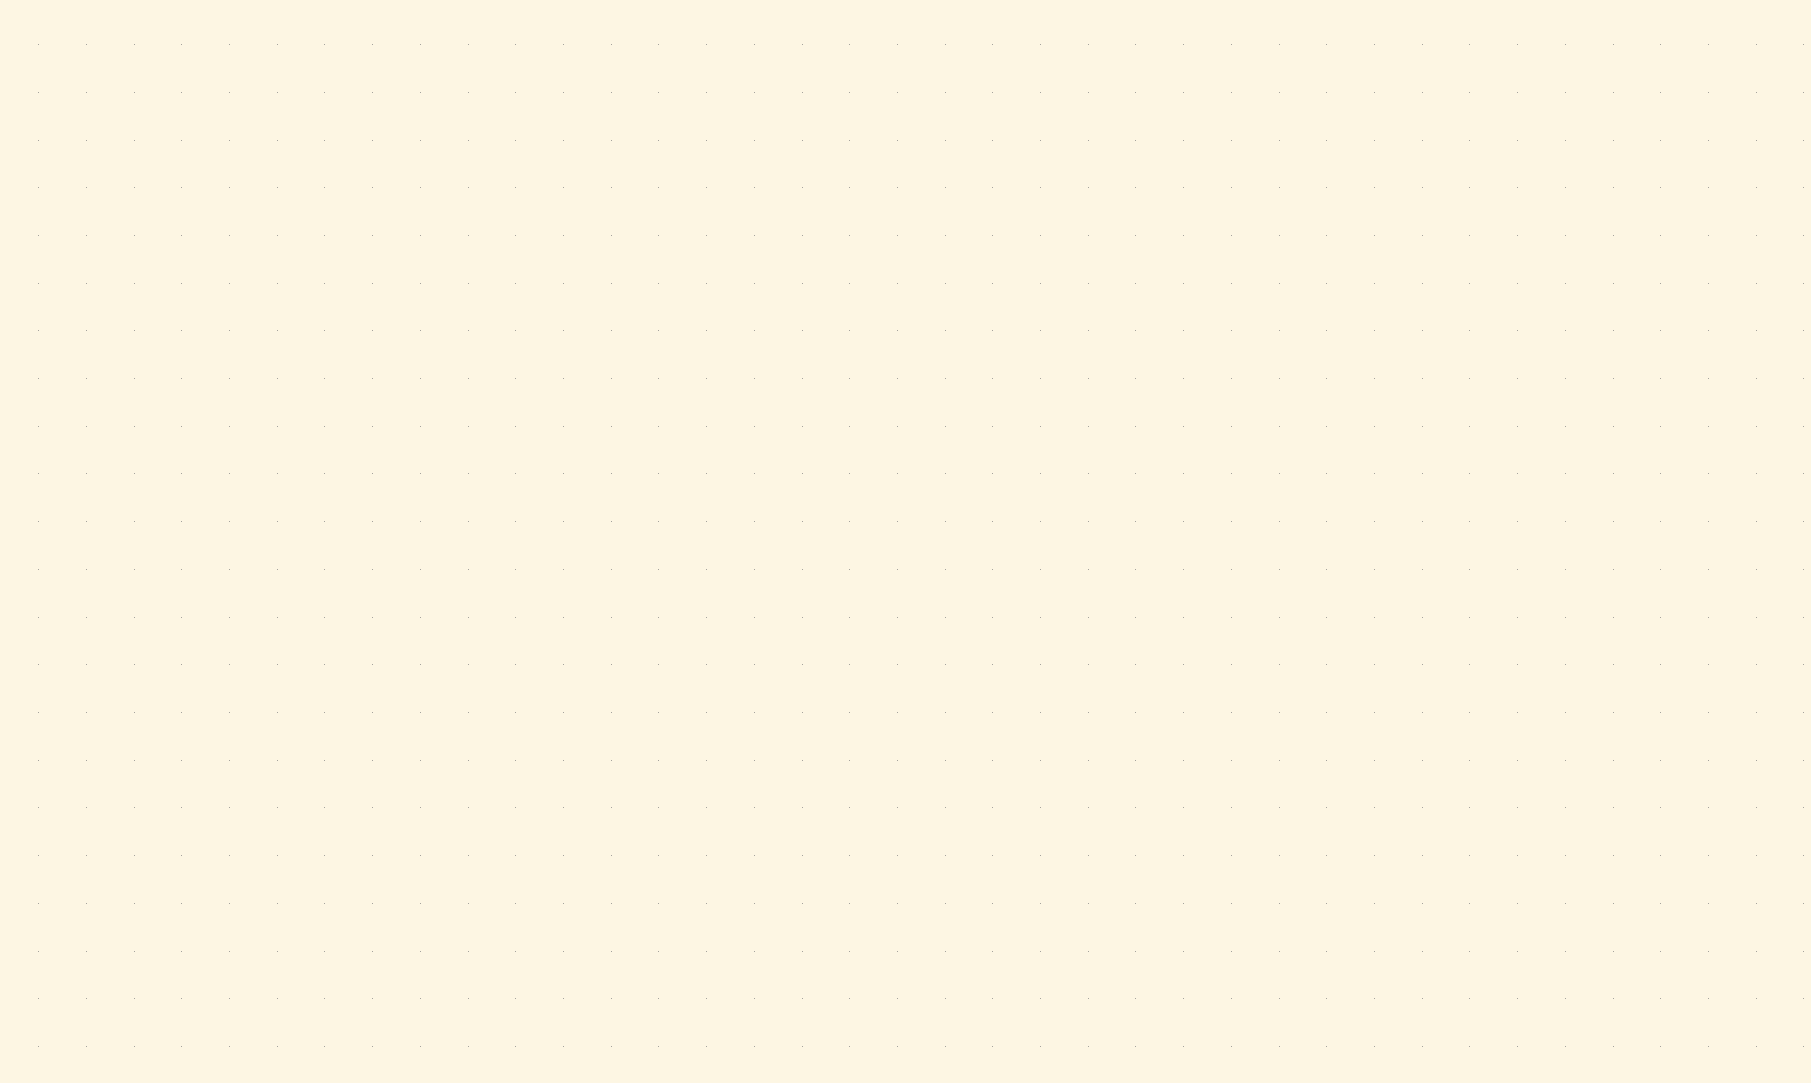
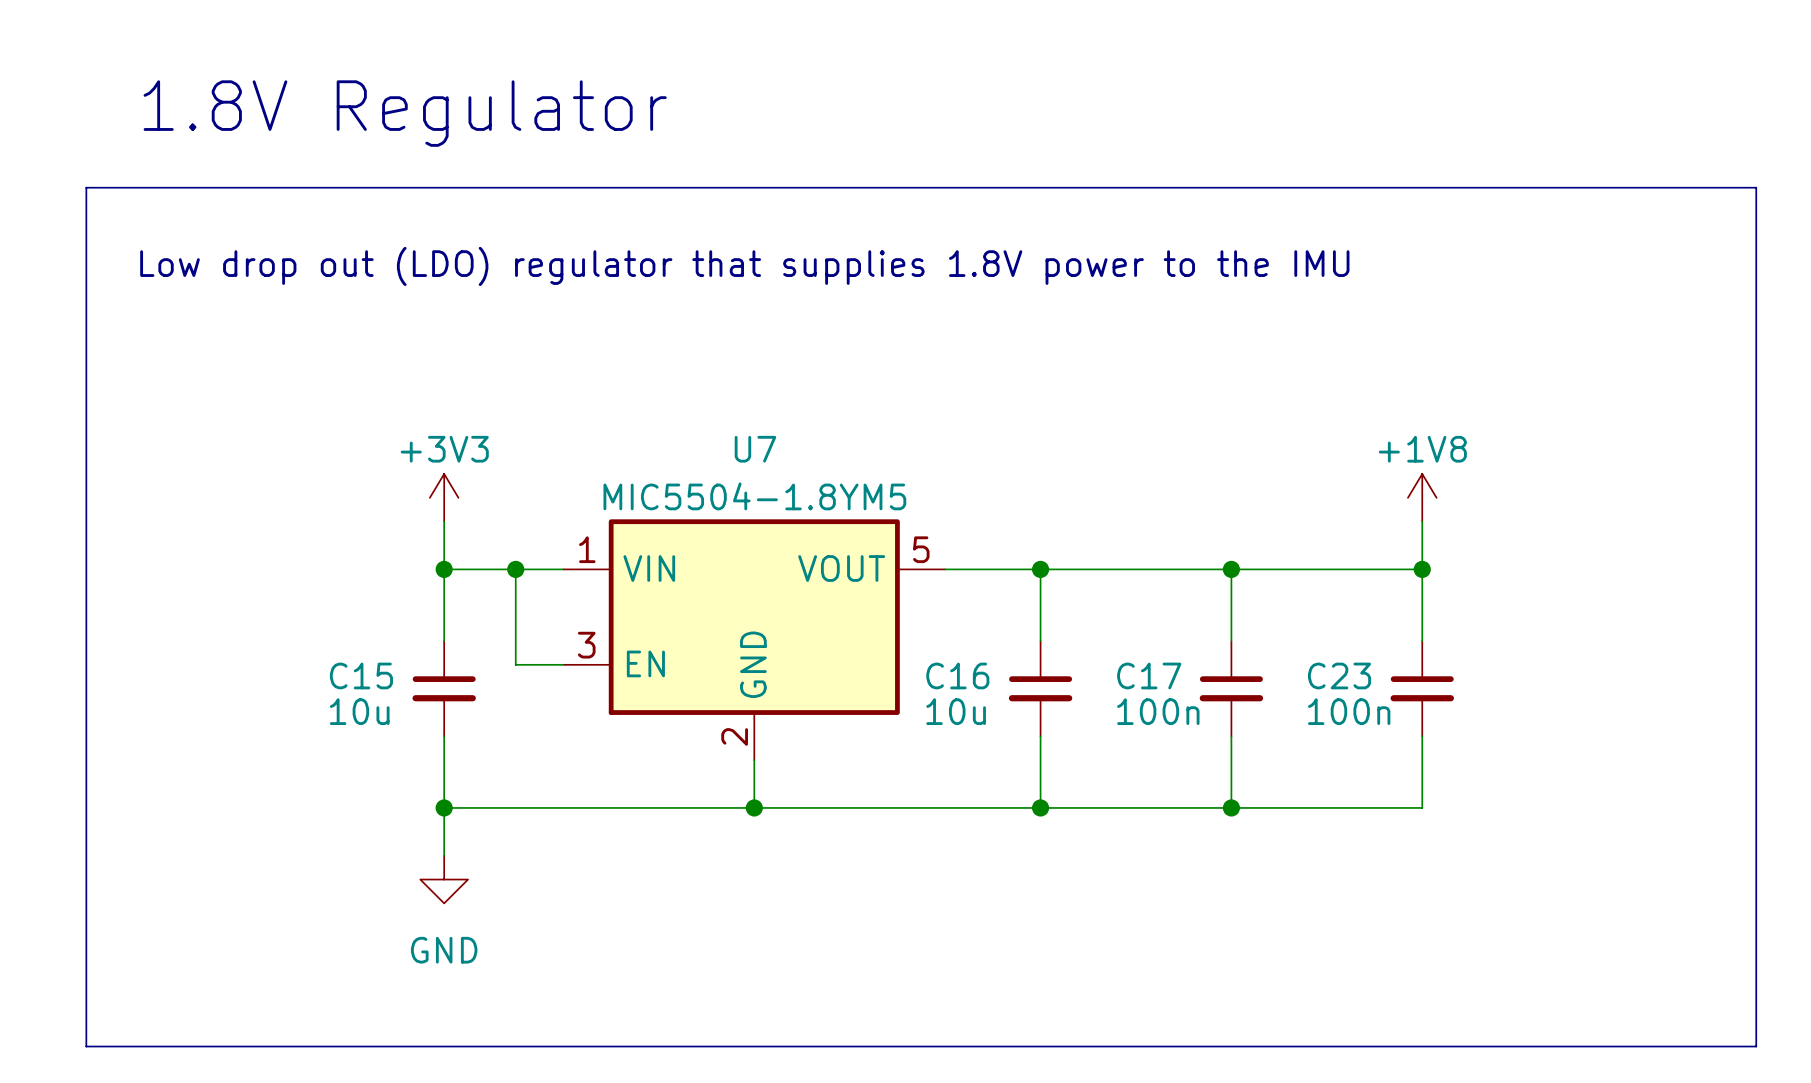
text: none -> 1.8V Regulator (405, 113)
line: none -> (86, 187) (86, 1046) (1756, 1046) (1756, 187) (86, 187)
text: none -> Low drop out (LDO) regulator that supplies 1.8V power to the IMU (744, 266)
power symbol: none -> +3V3 (444, 497)
power symbol: none -> +1V8 (1422, 497)
wire: none -> (444, 521) (444, 640)
wire: none -> (1422, 521) (1422, 640)
wire: none -> (444, 569) (563, 569)
junction: none -> (444, 569)
wire: none -> (515, 569) (515, 664) (563, 664)
junction: none -> (515, 569)
wire: none -> (945, 569) (1422, 569)
wire: none -> (1040, 569) (1040, 640)
junction: none -> (1040, 569)
wire: none -> (1231, 569) (1231, 640)
junction: none -> (1231, 569)
junction: none -> (1422, 569)
U7: none -> MIC5504-1.8YM5 (754, 639)
C15: none -> 10u (444, 688)
C16: none -> 10u (1040, 688)
C17: none -> 100n (1231, 688)
C23: none -> 100n (1422, 688)
wire: none -> (444, 736) (444, 855)
wire: none -> (1040, 736) (1040, 807)
wire: none -> (1231, 736) (1231, 807)
wire: none -> (1422, 736) (1422, 807) (444, 807)
wire: none -> (754, 760) (754, 807)
junction: none -> (444, 807)
junction: none -> (754, 807)
junction: none -> (1040, 807)
junction: none -> (1231, 807)
power symbol: none -> GND (444, 879)

